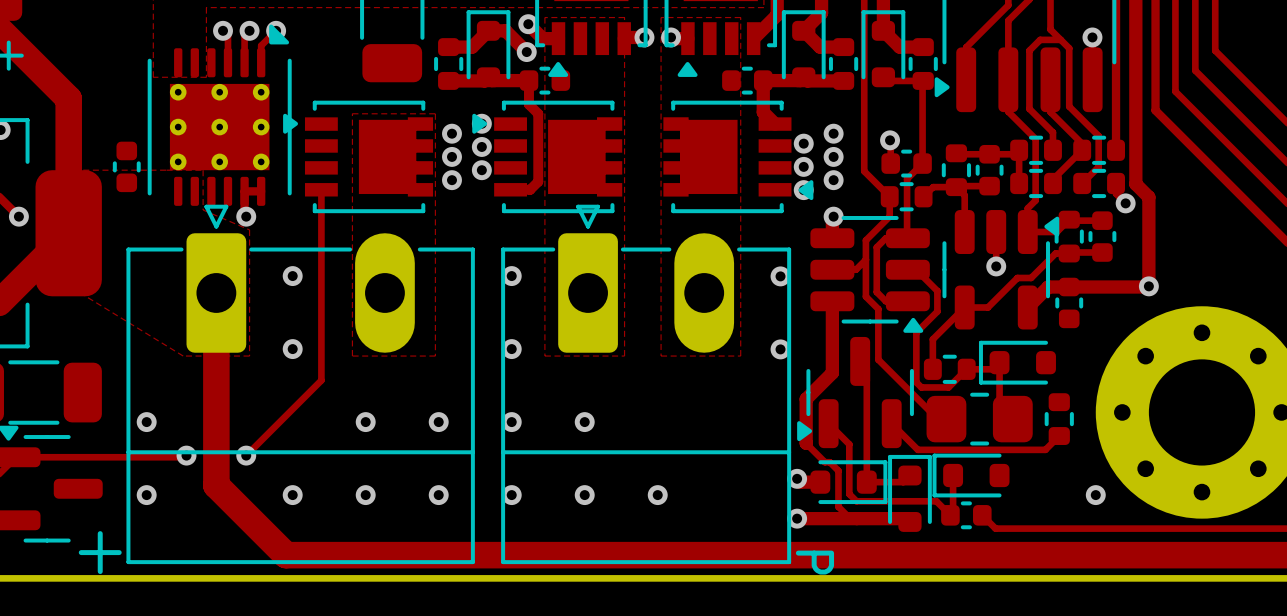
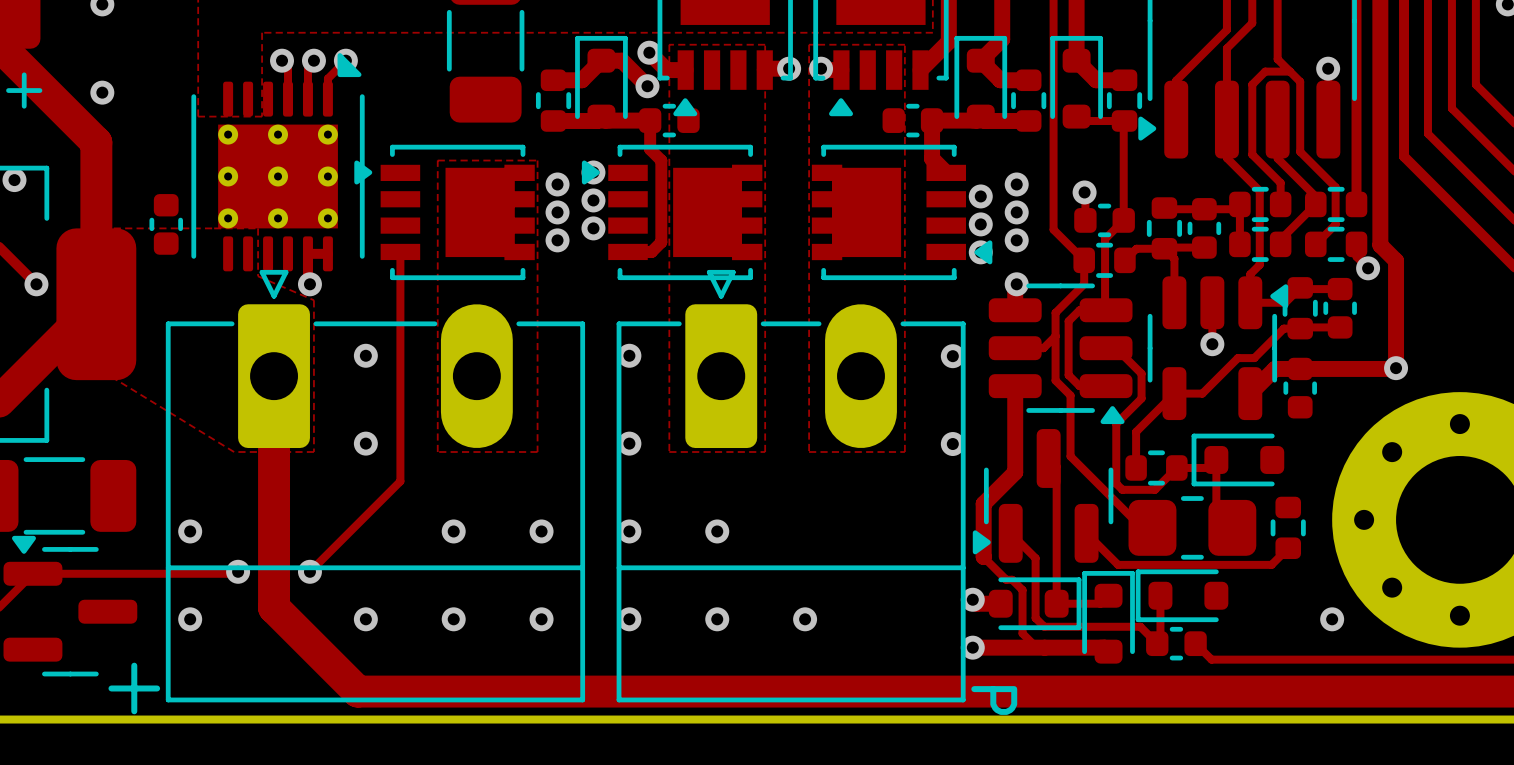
via: none -> (102, 92)

